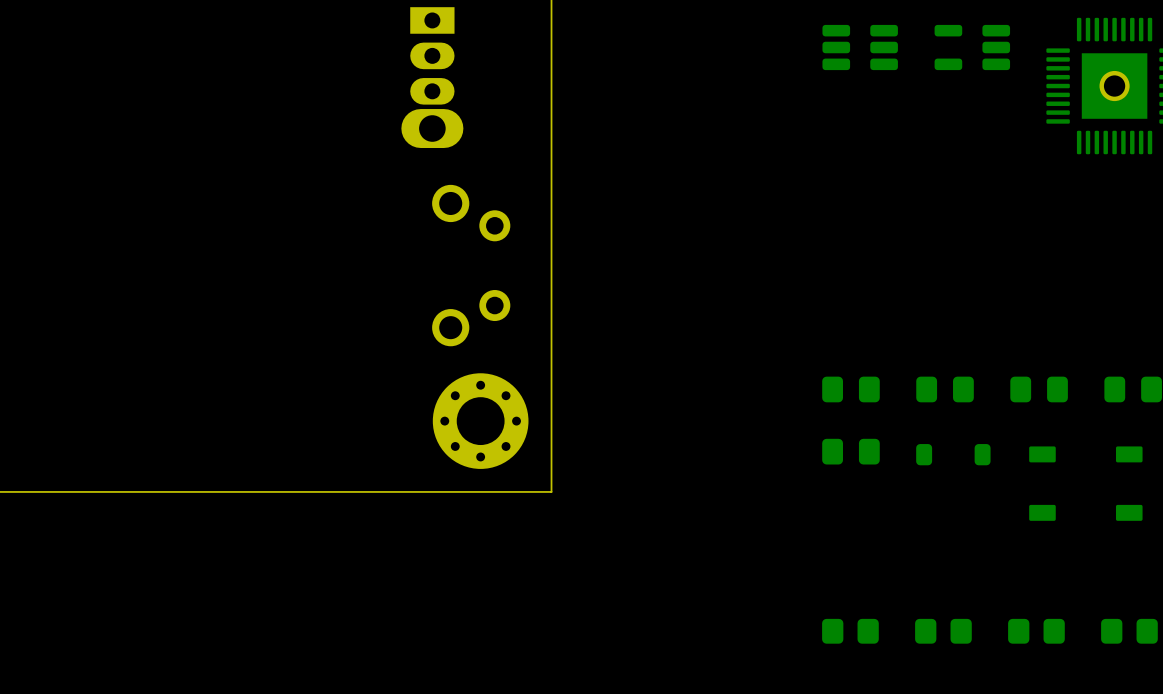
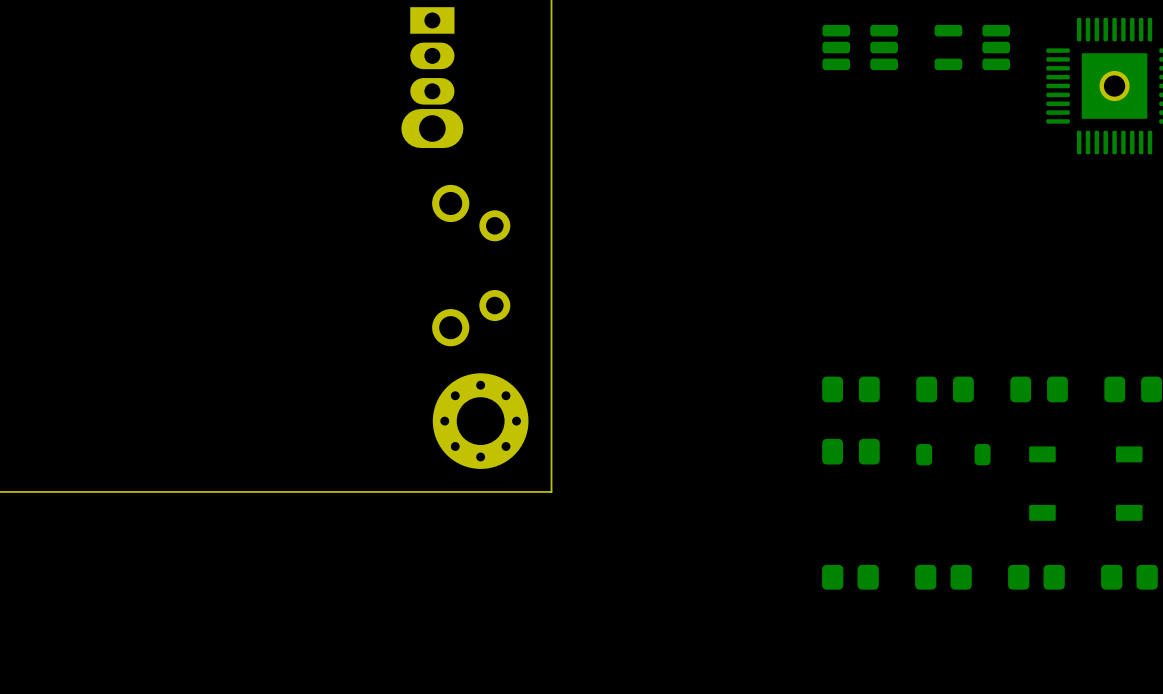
part: none -> (850, 577)
part: none -> (943, 577)
part: none -> (1036, 577)
part: none -> (1129, 577)
part: (850, 631) -> none
part: (943, 631) -> none
part: (1036, 631) -> none
part: (1129, 631) -> none

